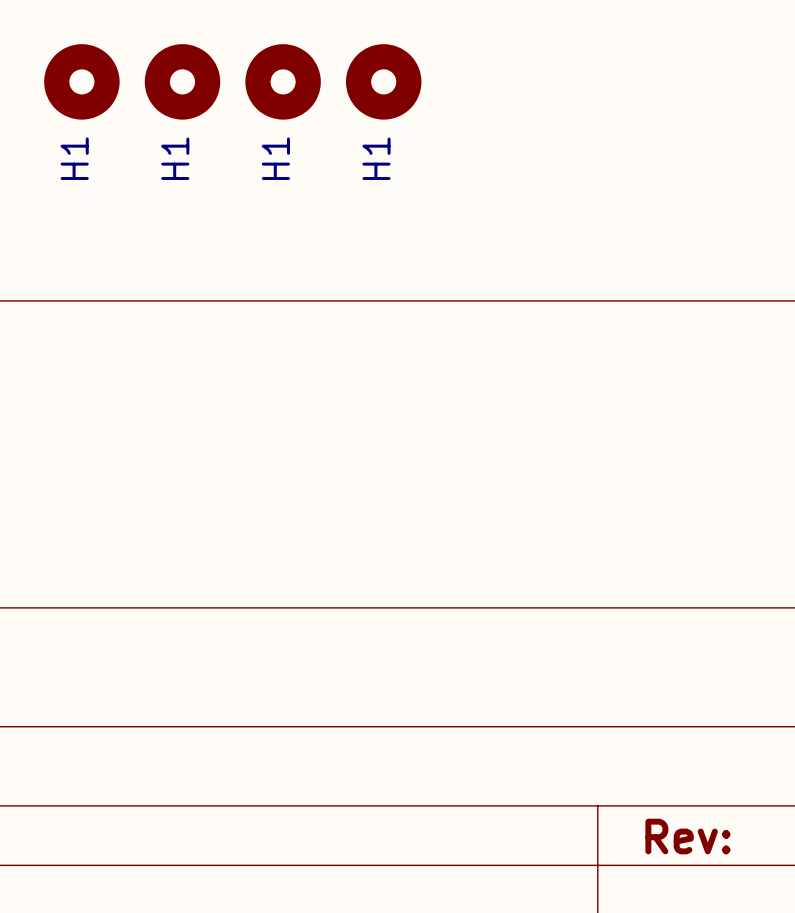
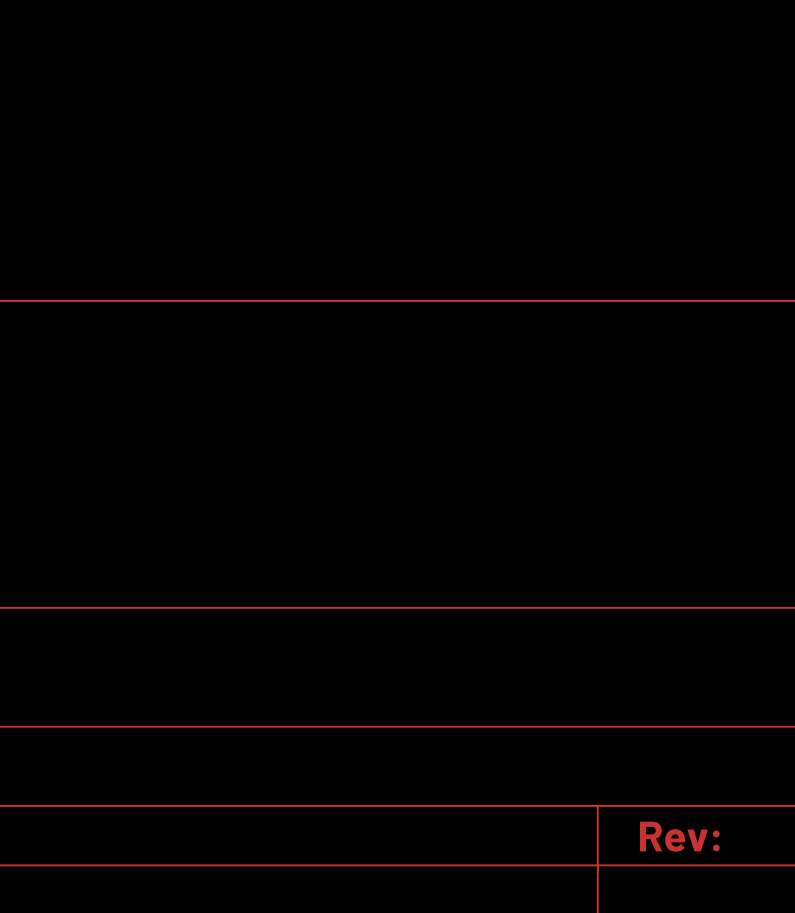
H1: (81, 81) -> none
H1: (182, 81) -> none
H1: (283, 81) -> none
H1: (383, 81) -> none

